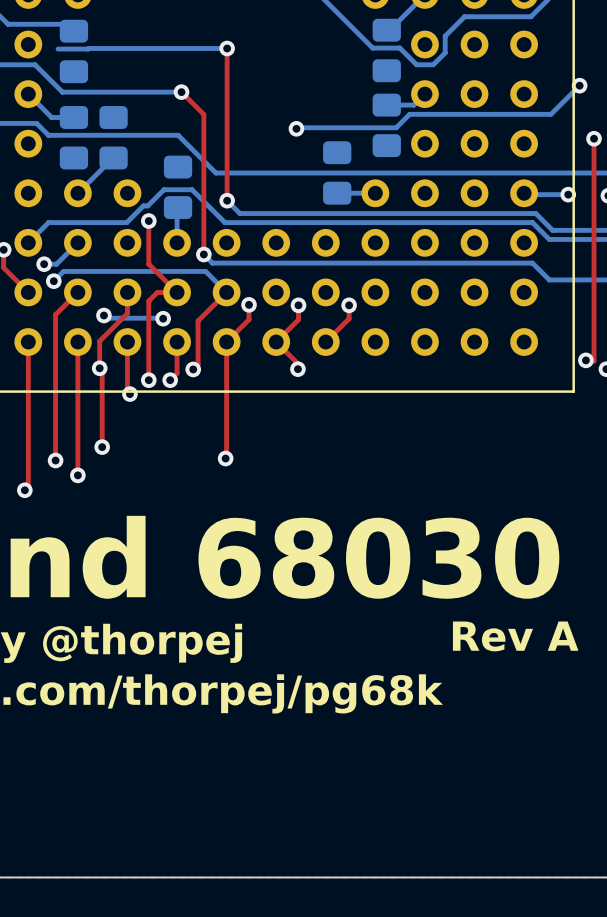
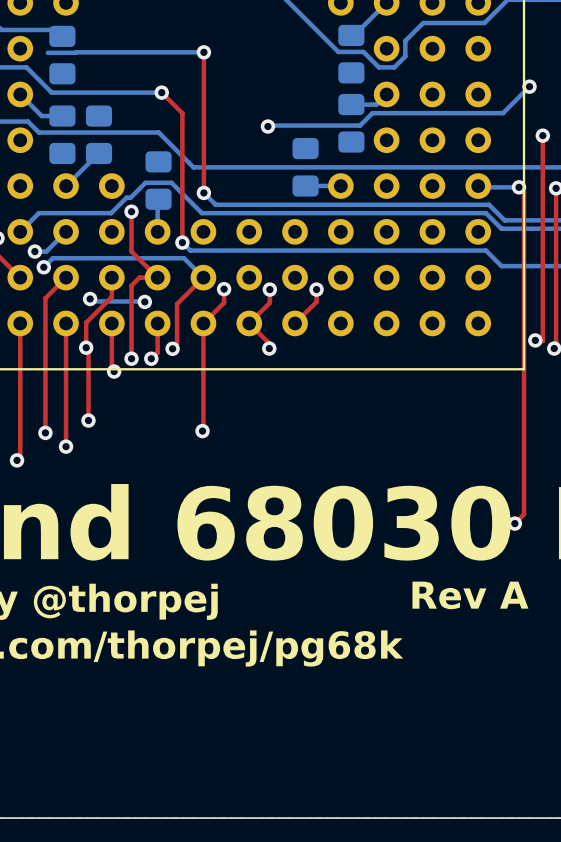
top track: none -> (519, 187) (524, 192) (524, 514) (514, 523)
via: none -> (514, 523)

